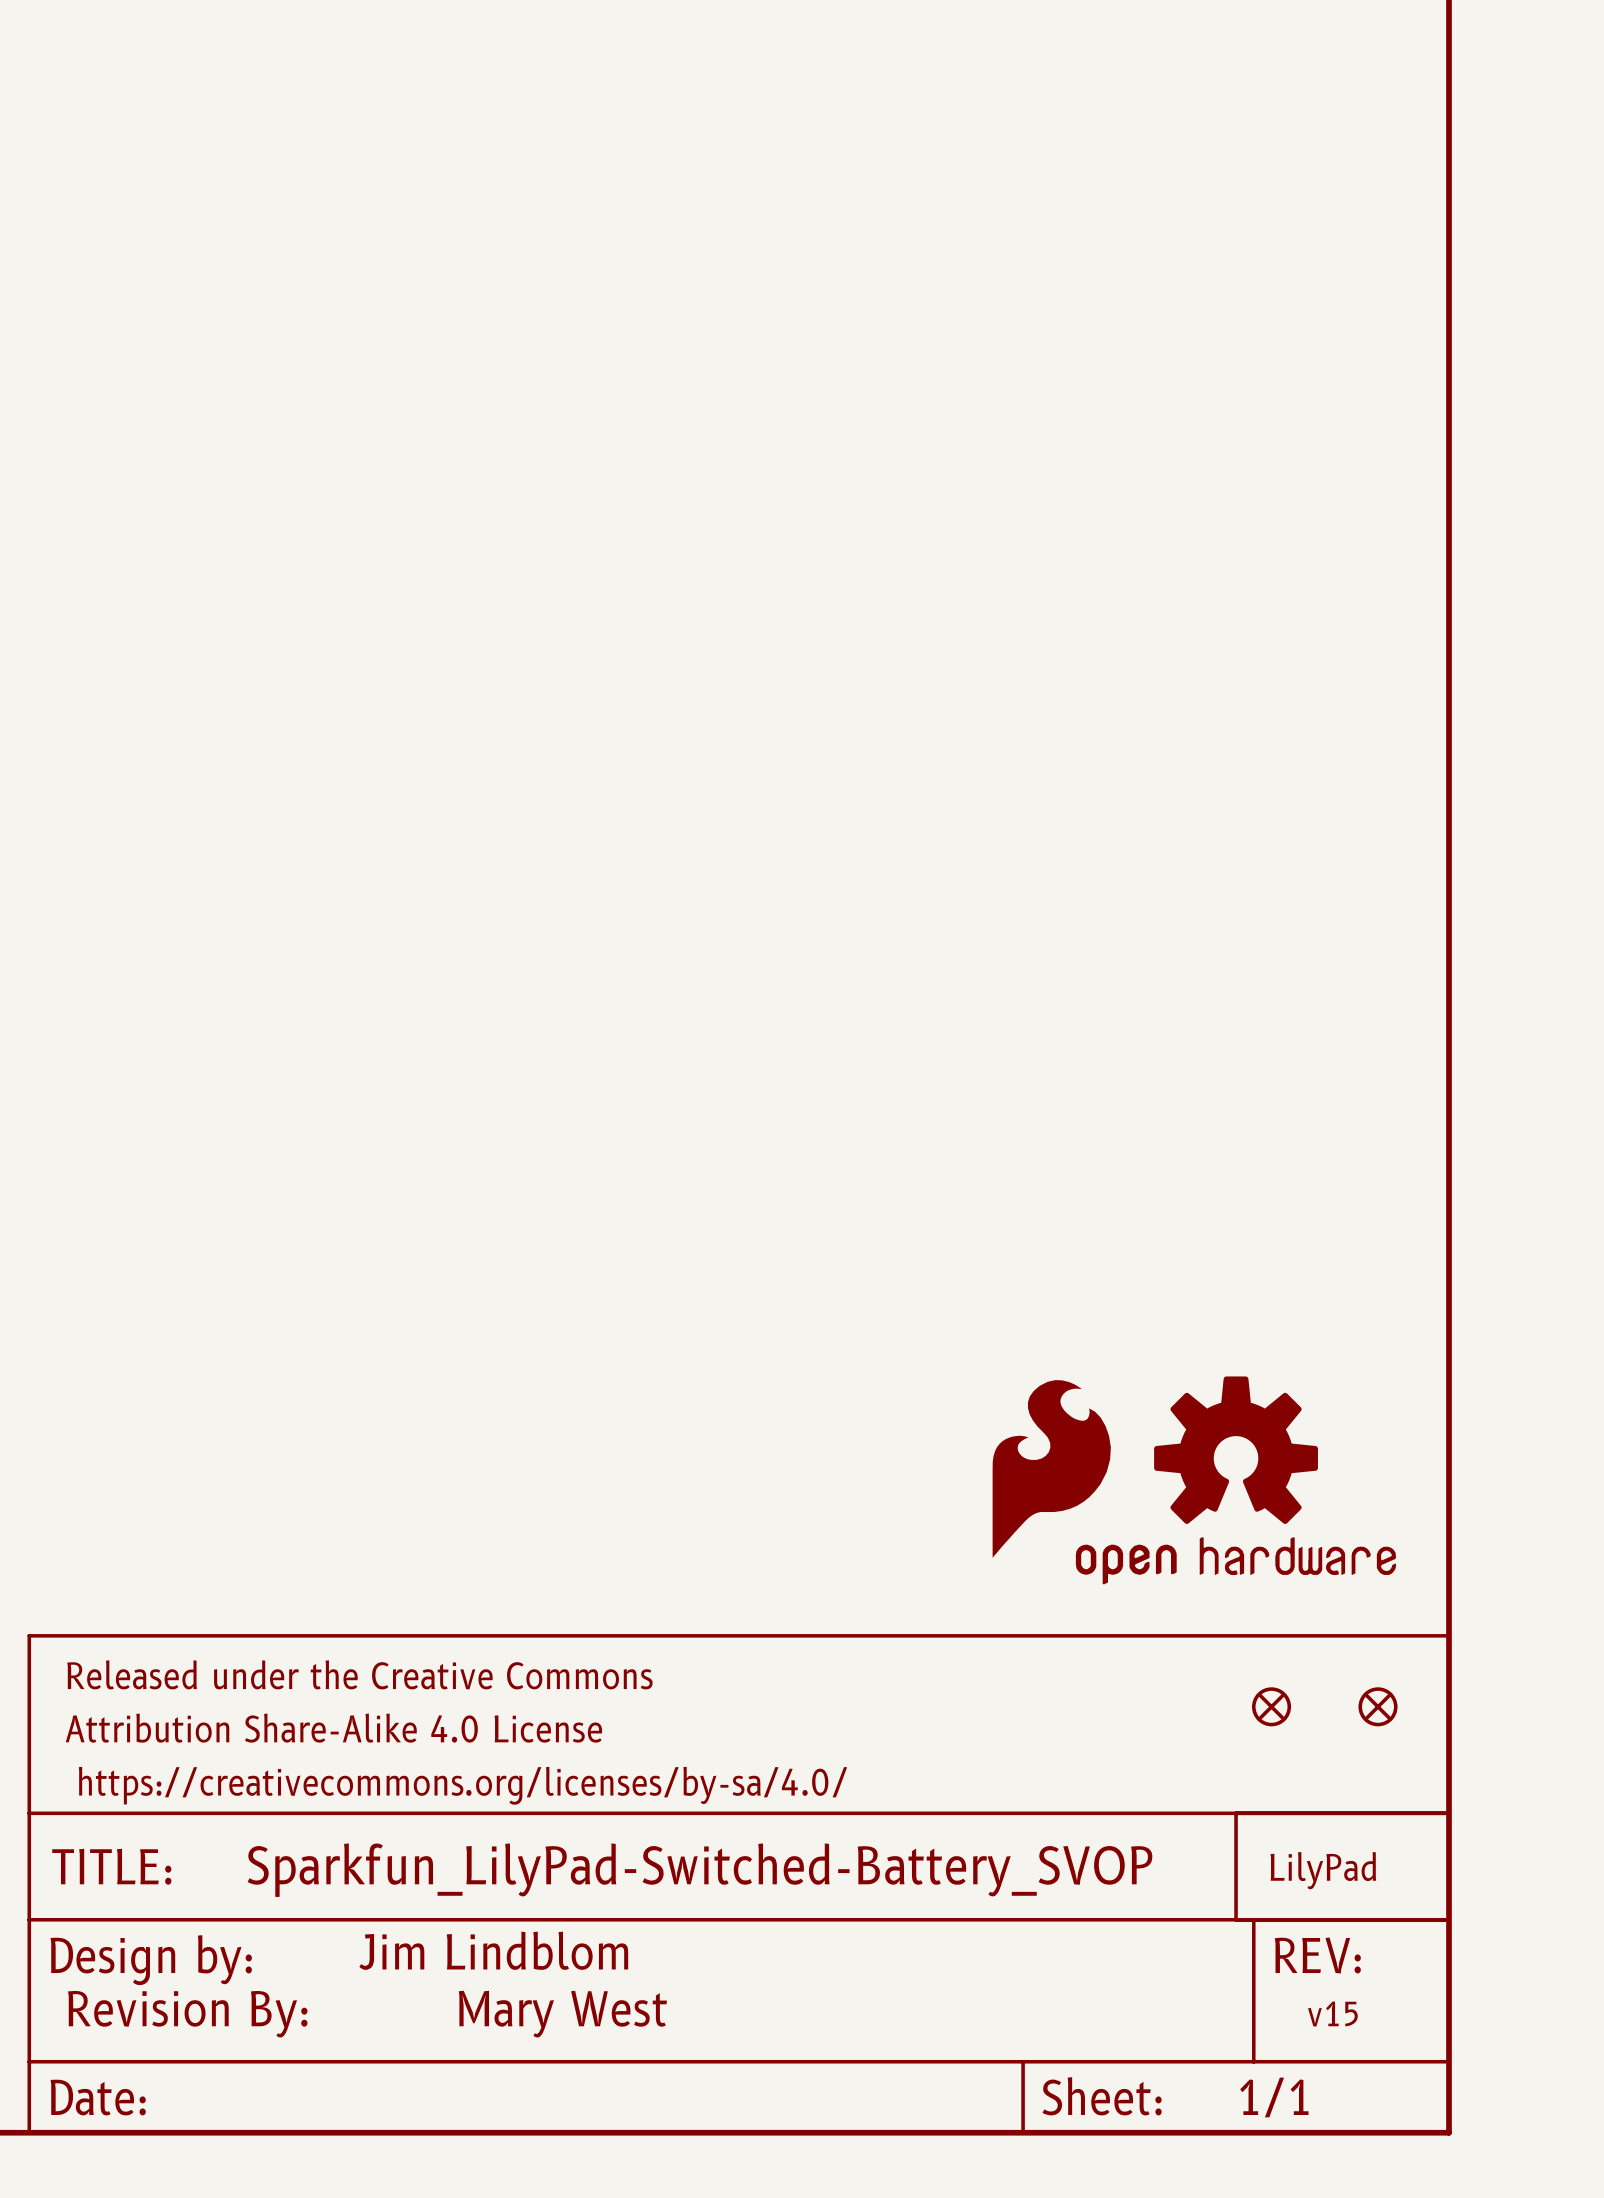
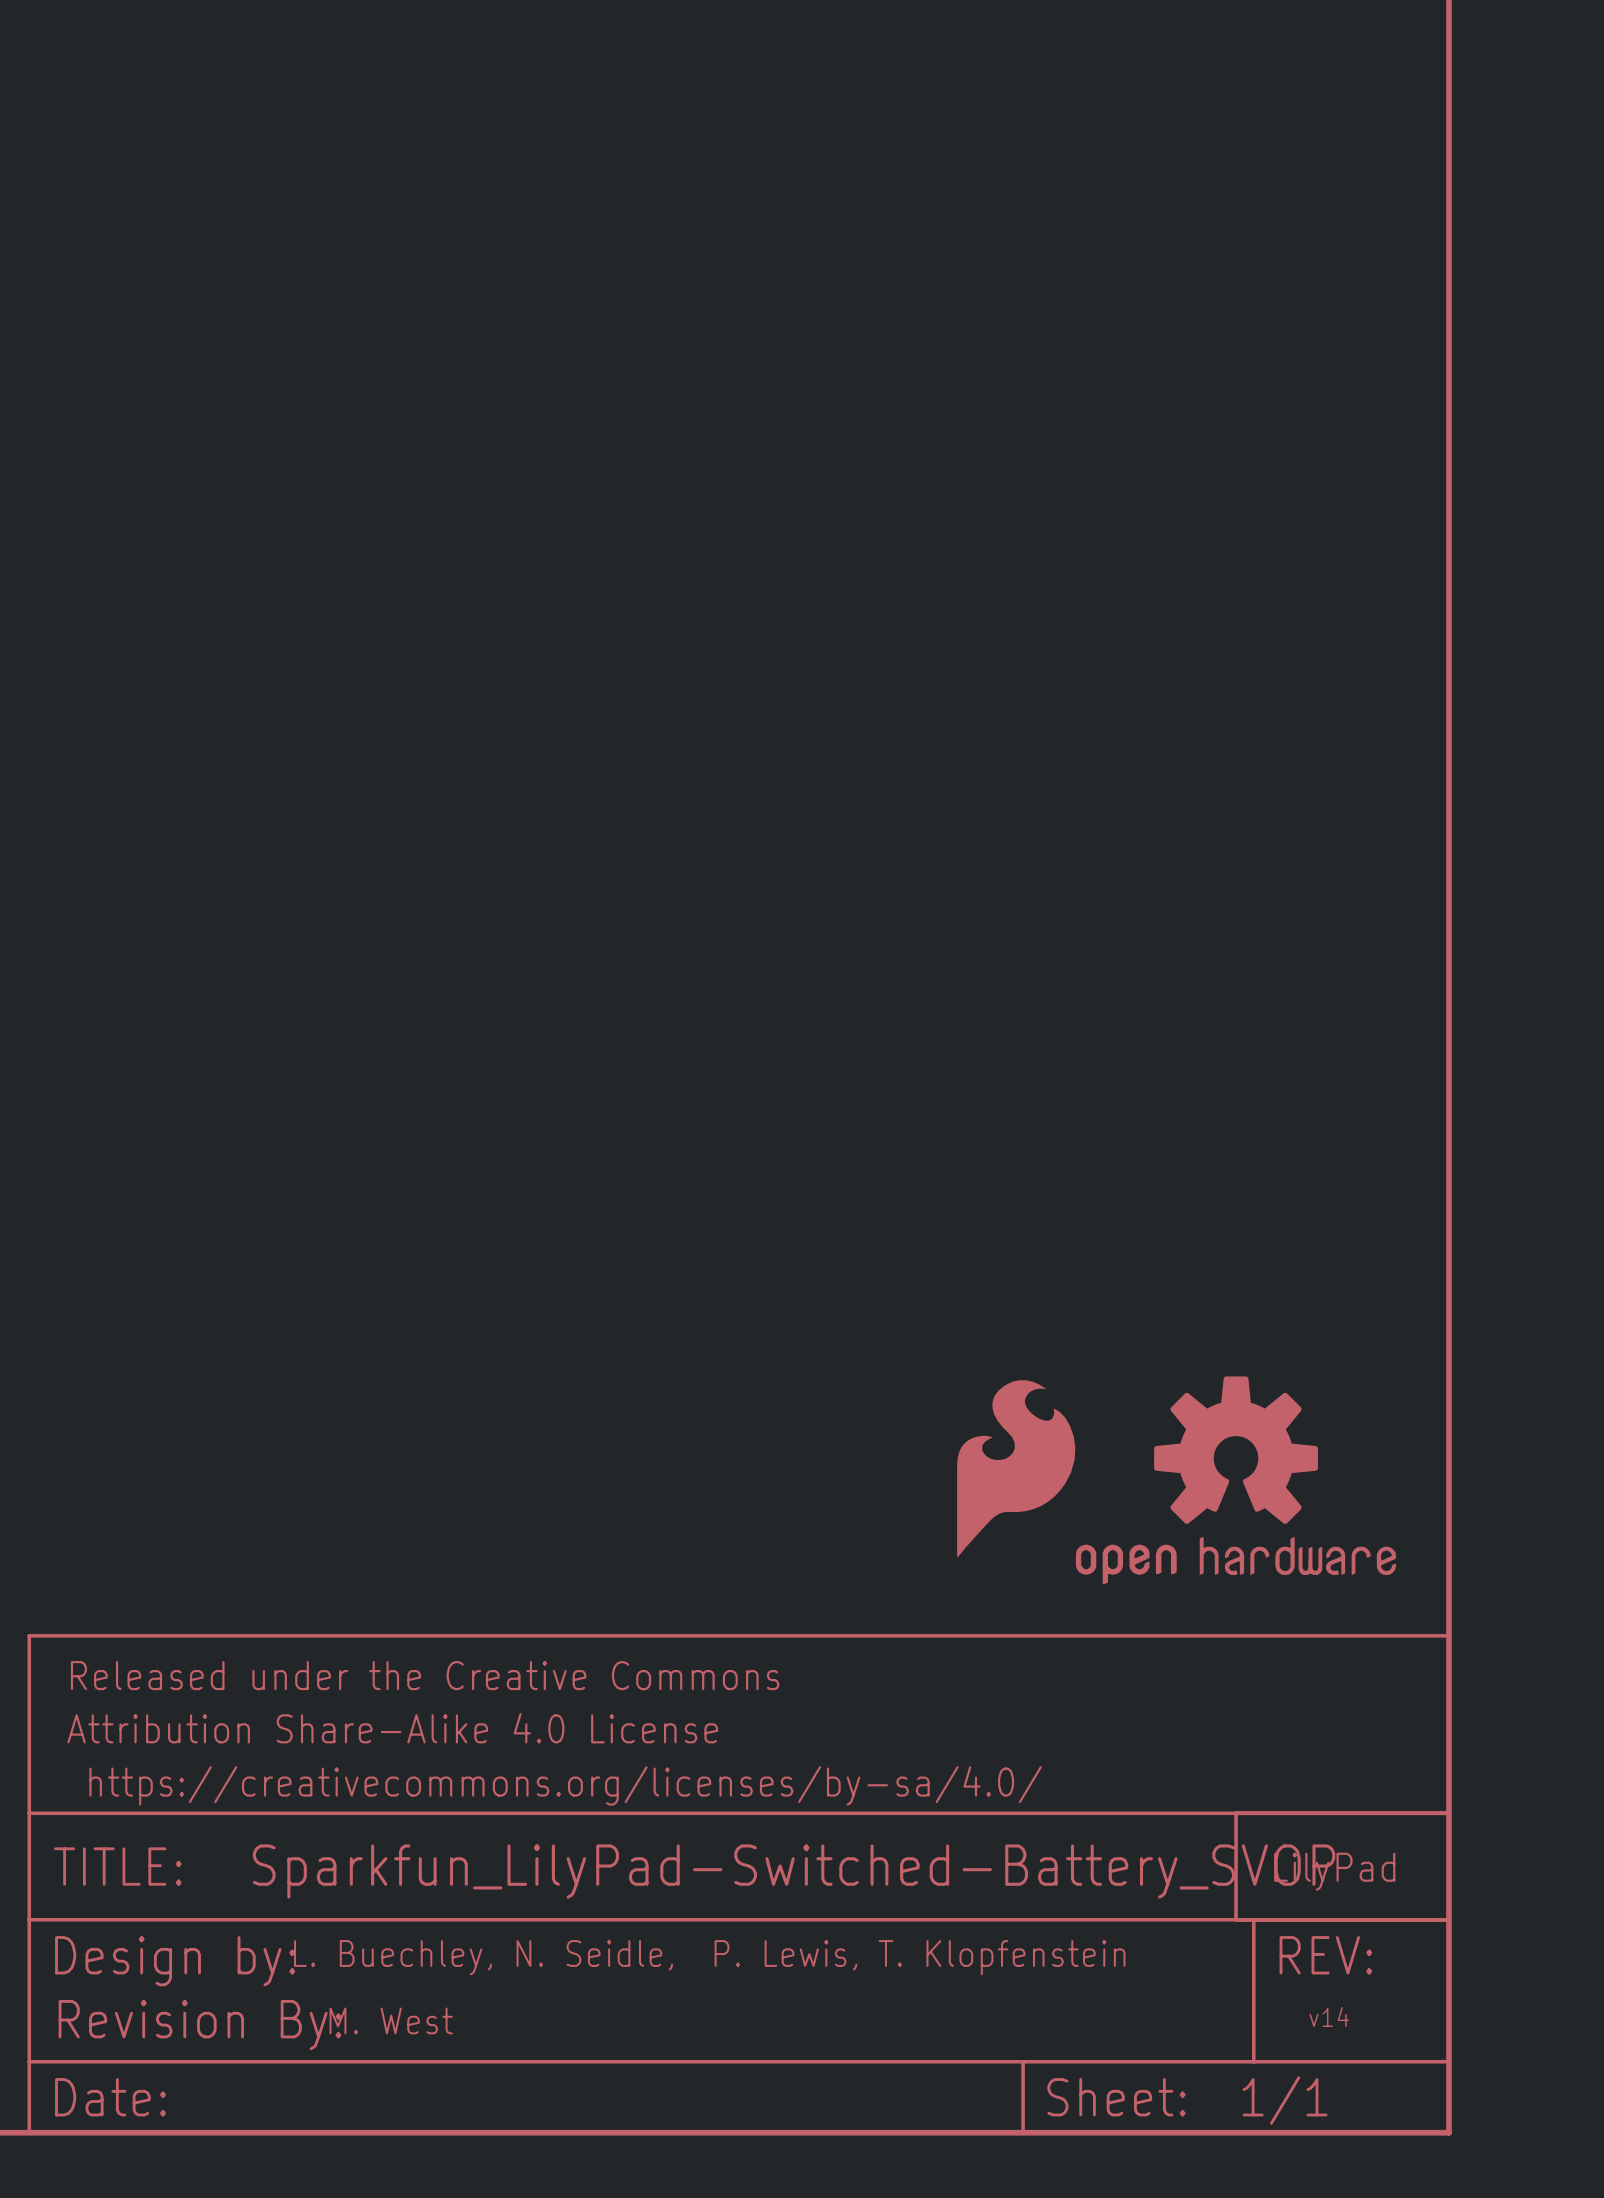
part position: (1051, 1468) -> (1016, 1468)
part: (1271, 1706) -> none
part: (1378, 1706) -> none
text: Jim Lindblom (493, 1950) -> none
text: none -> L. Buechley, N. Seidle, P. Lewis, T. Klopfenstein (709, 1957)
part position: (187, 2014) -> (199, 2025)
text: Mary West (562, 2014) -> M. West (391, 2020)
text: v15 (1332, 2014) -> v14 (1329, 2016)

